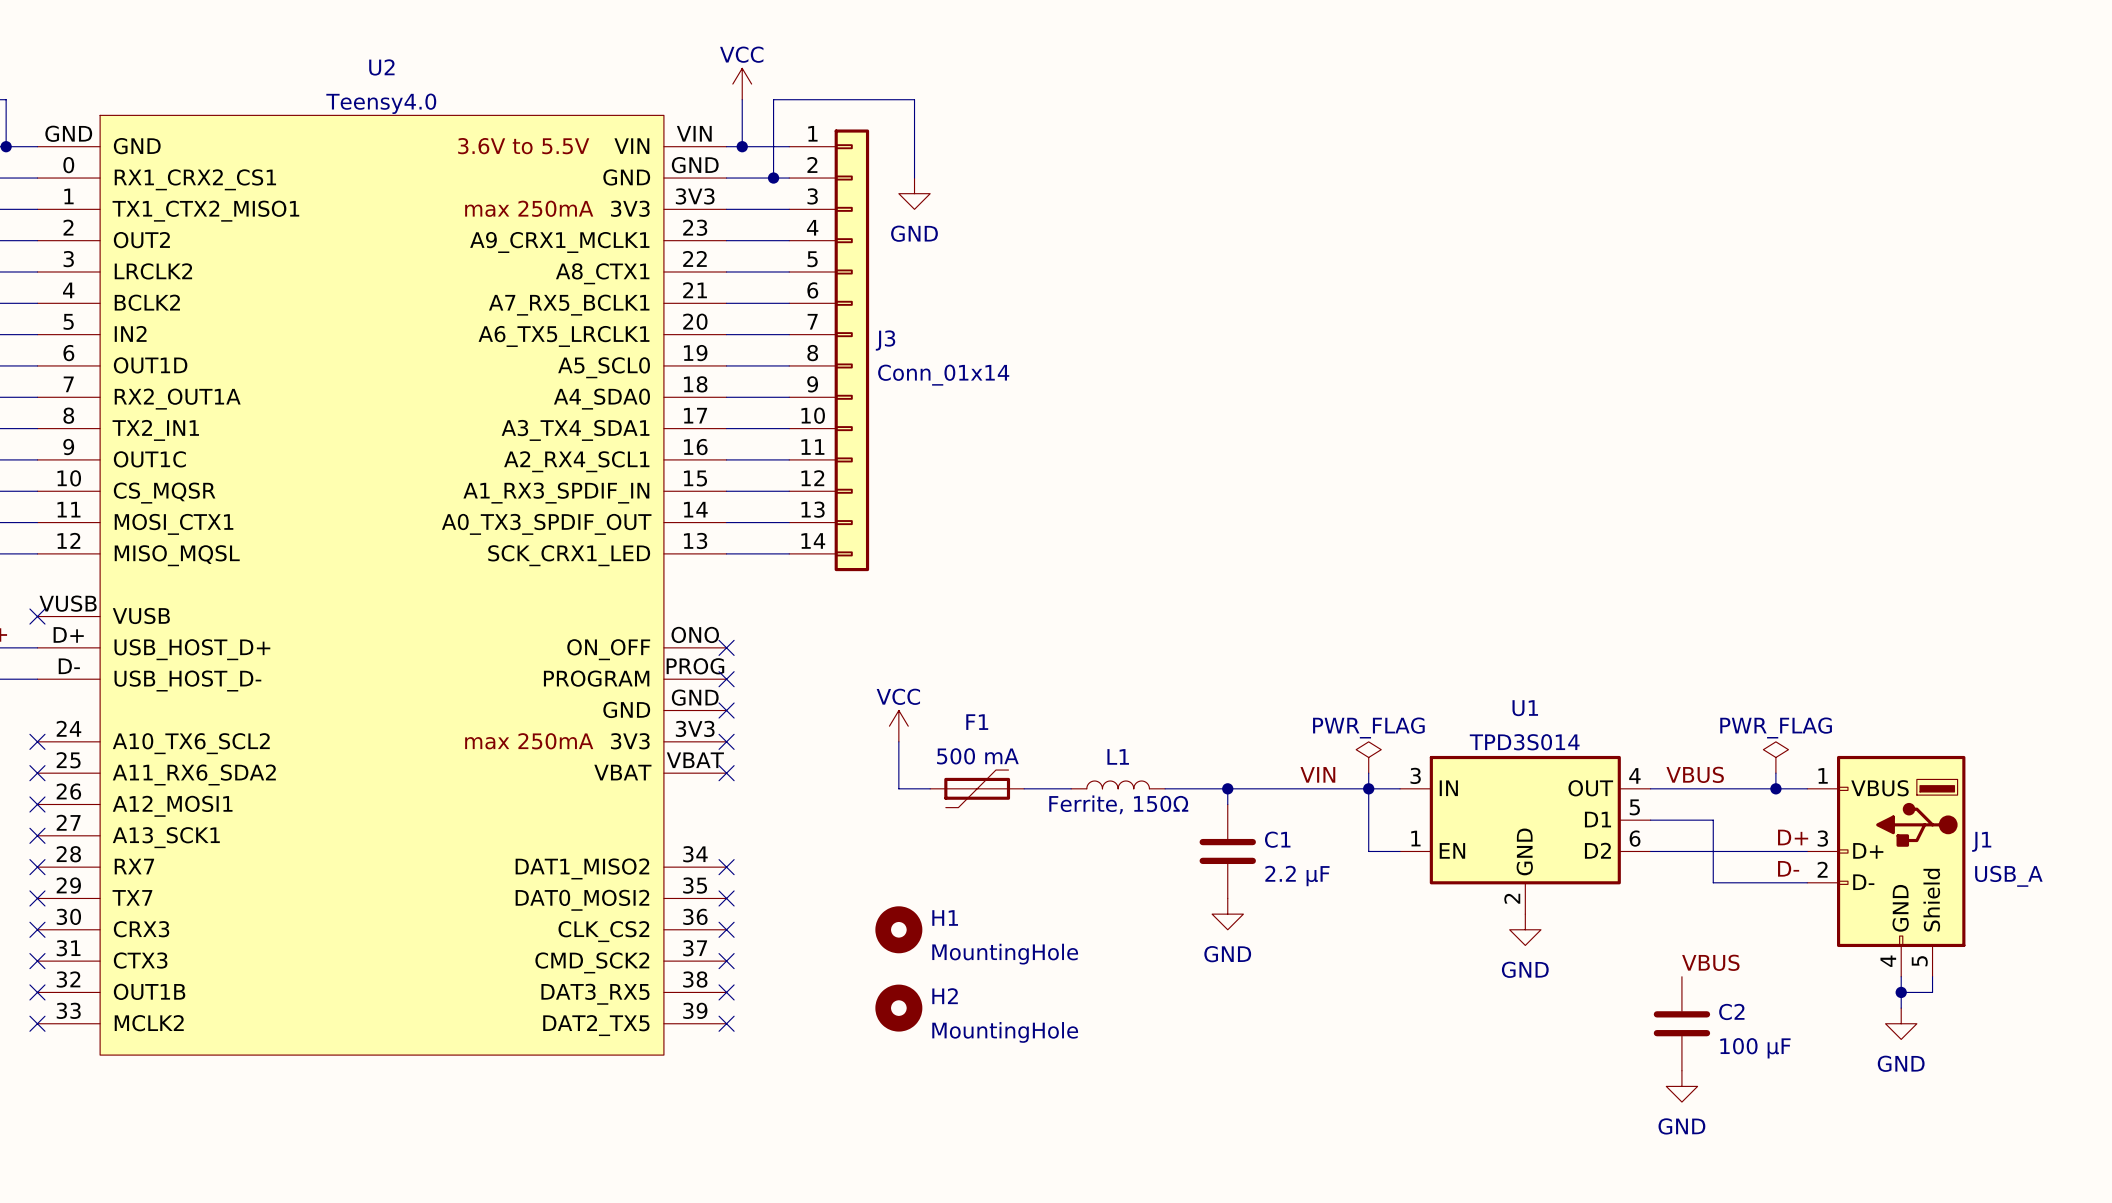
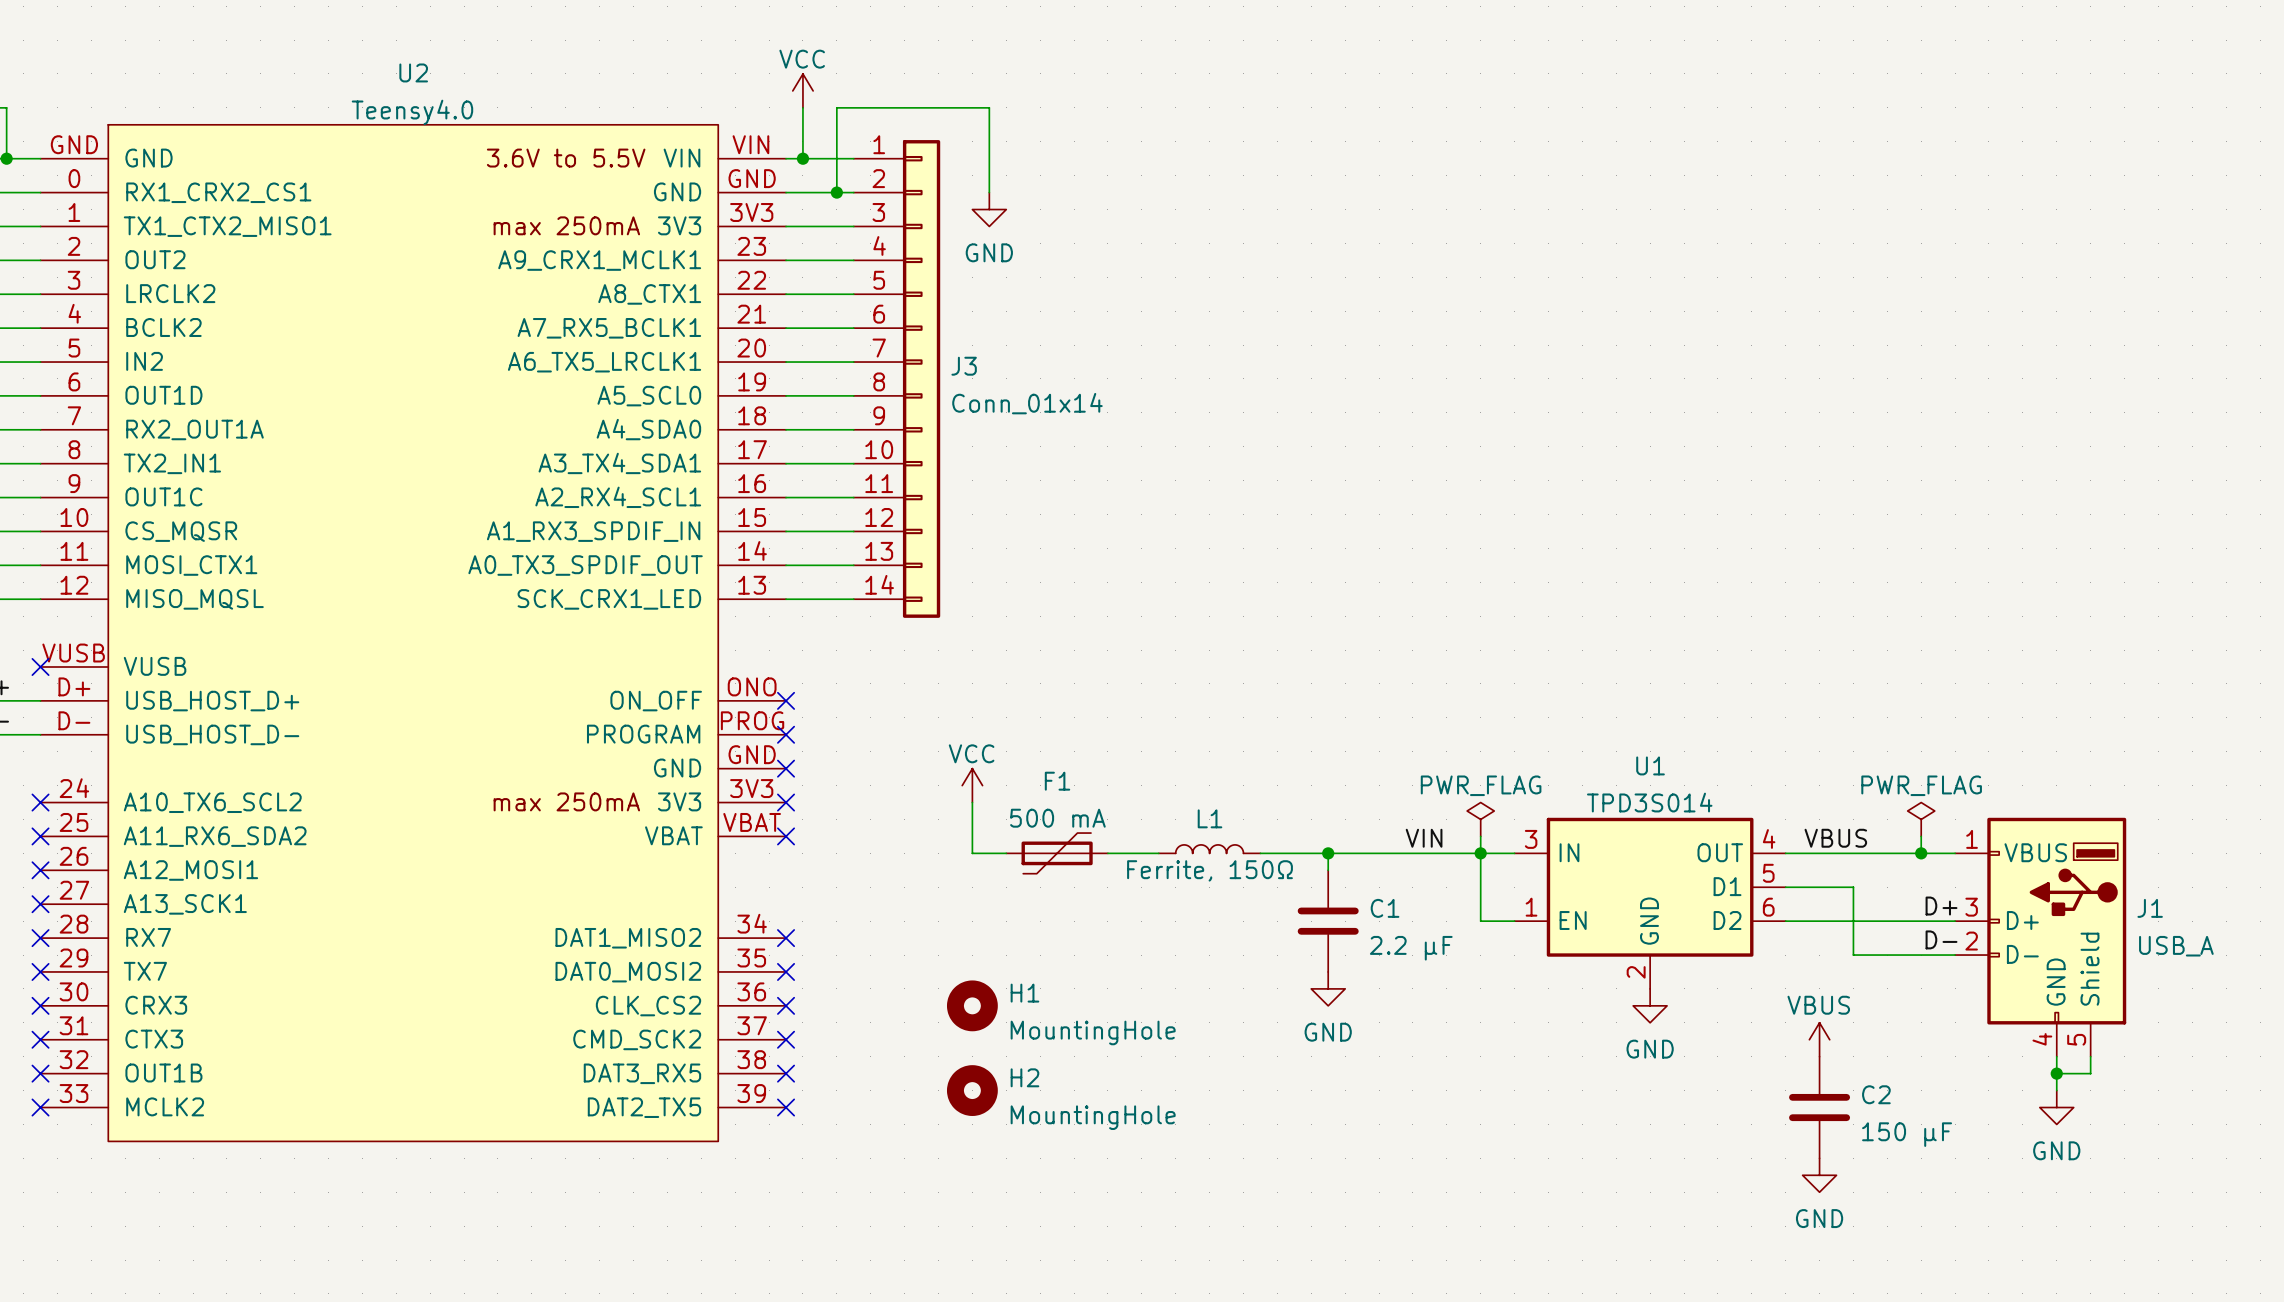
power symbol: none -> VBUS (1819, 1039)
label: VBUS (1710, 962) -> none
C2 value: 100 µF (1755, 1048) -> 150 µF (1907, 1134)

